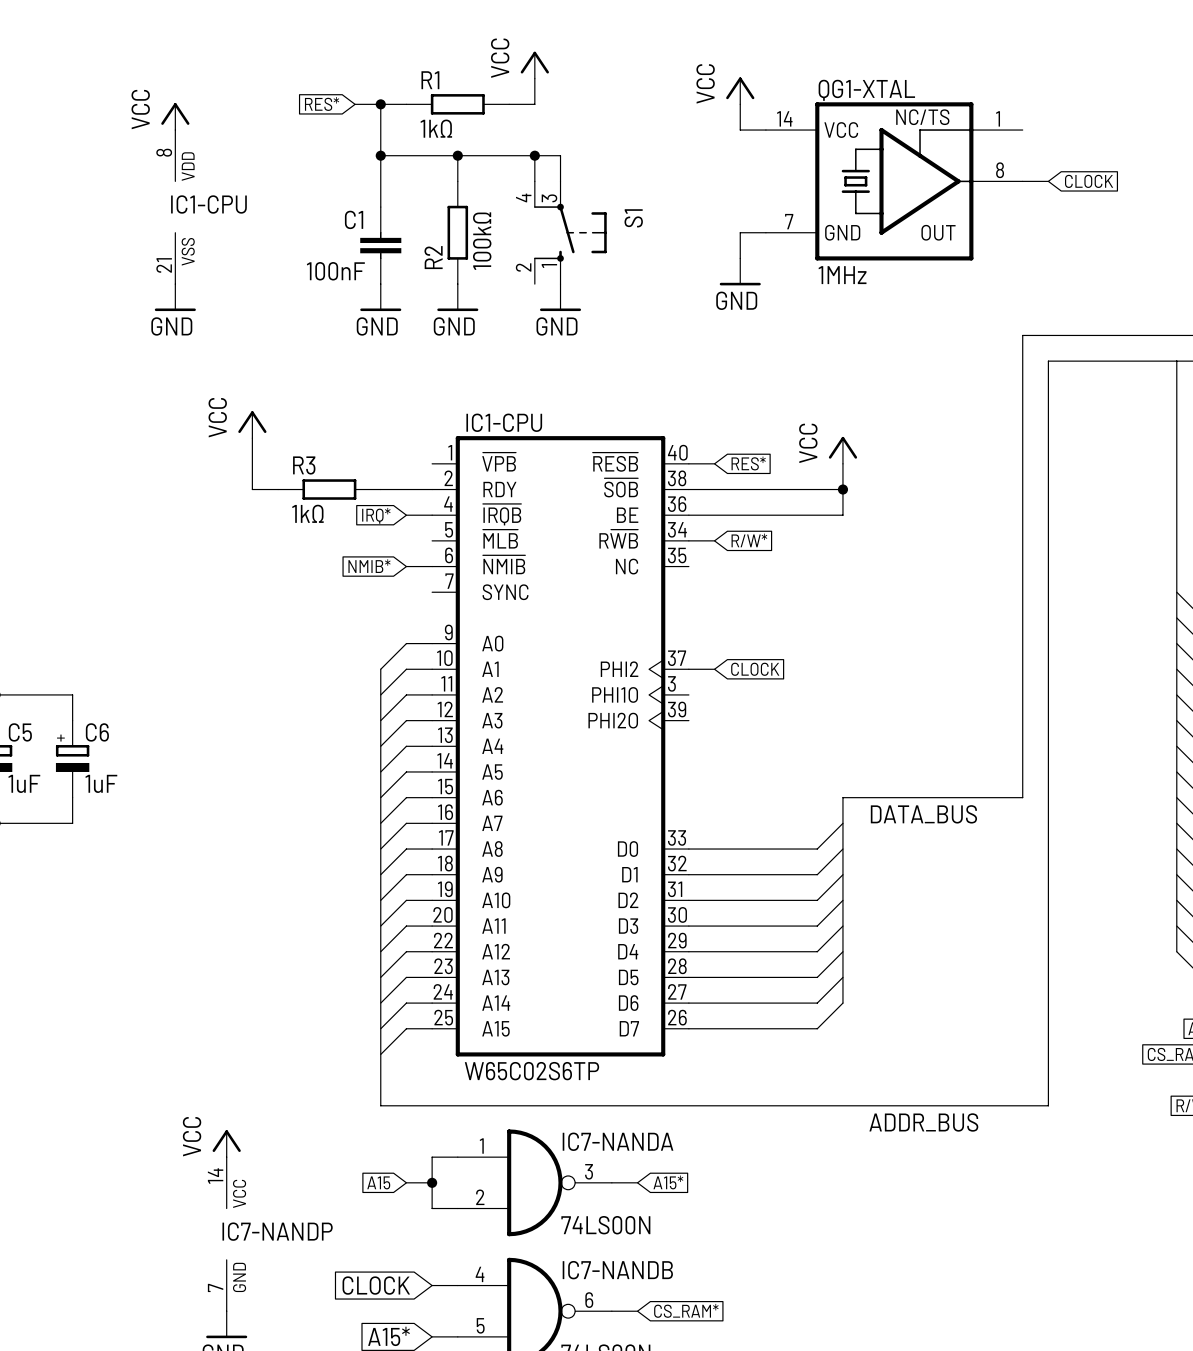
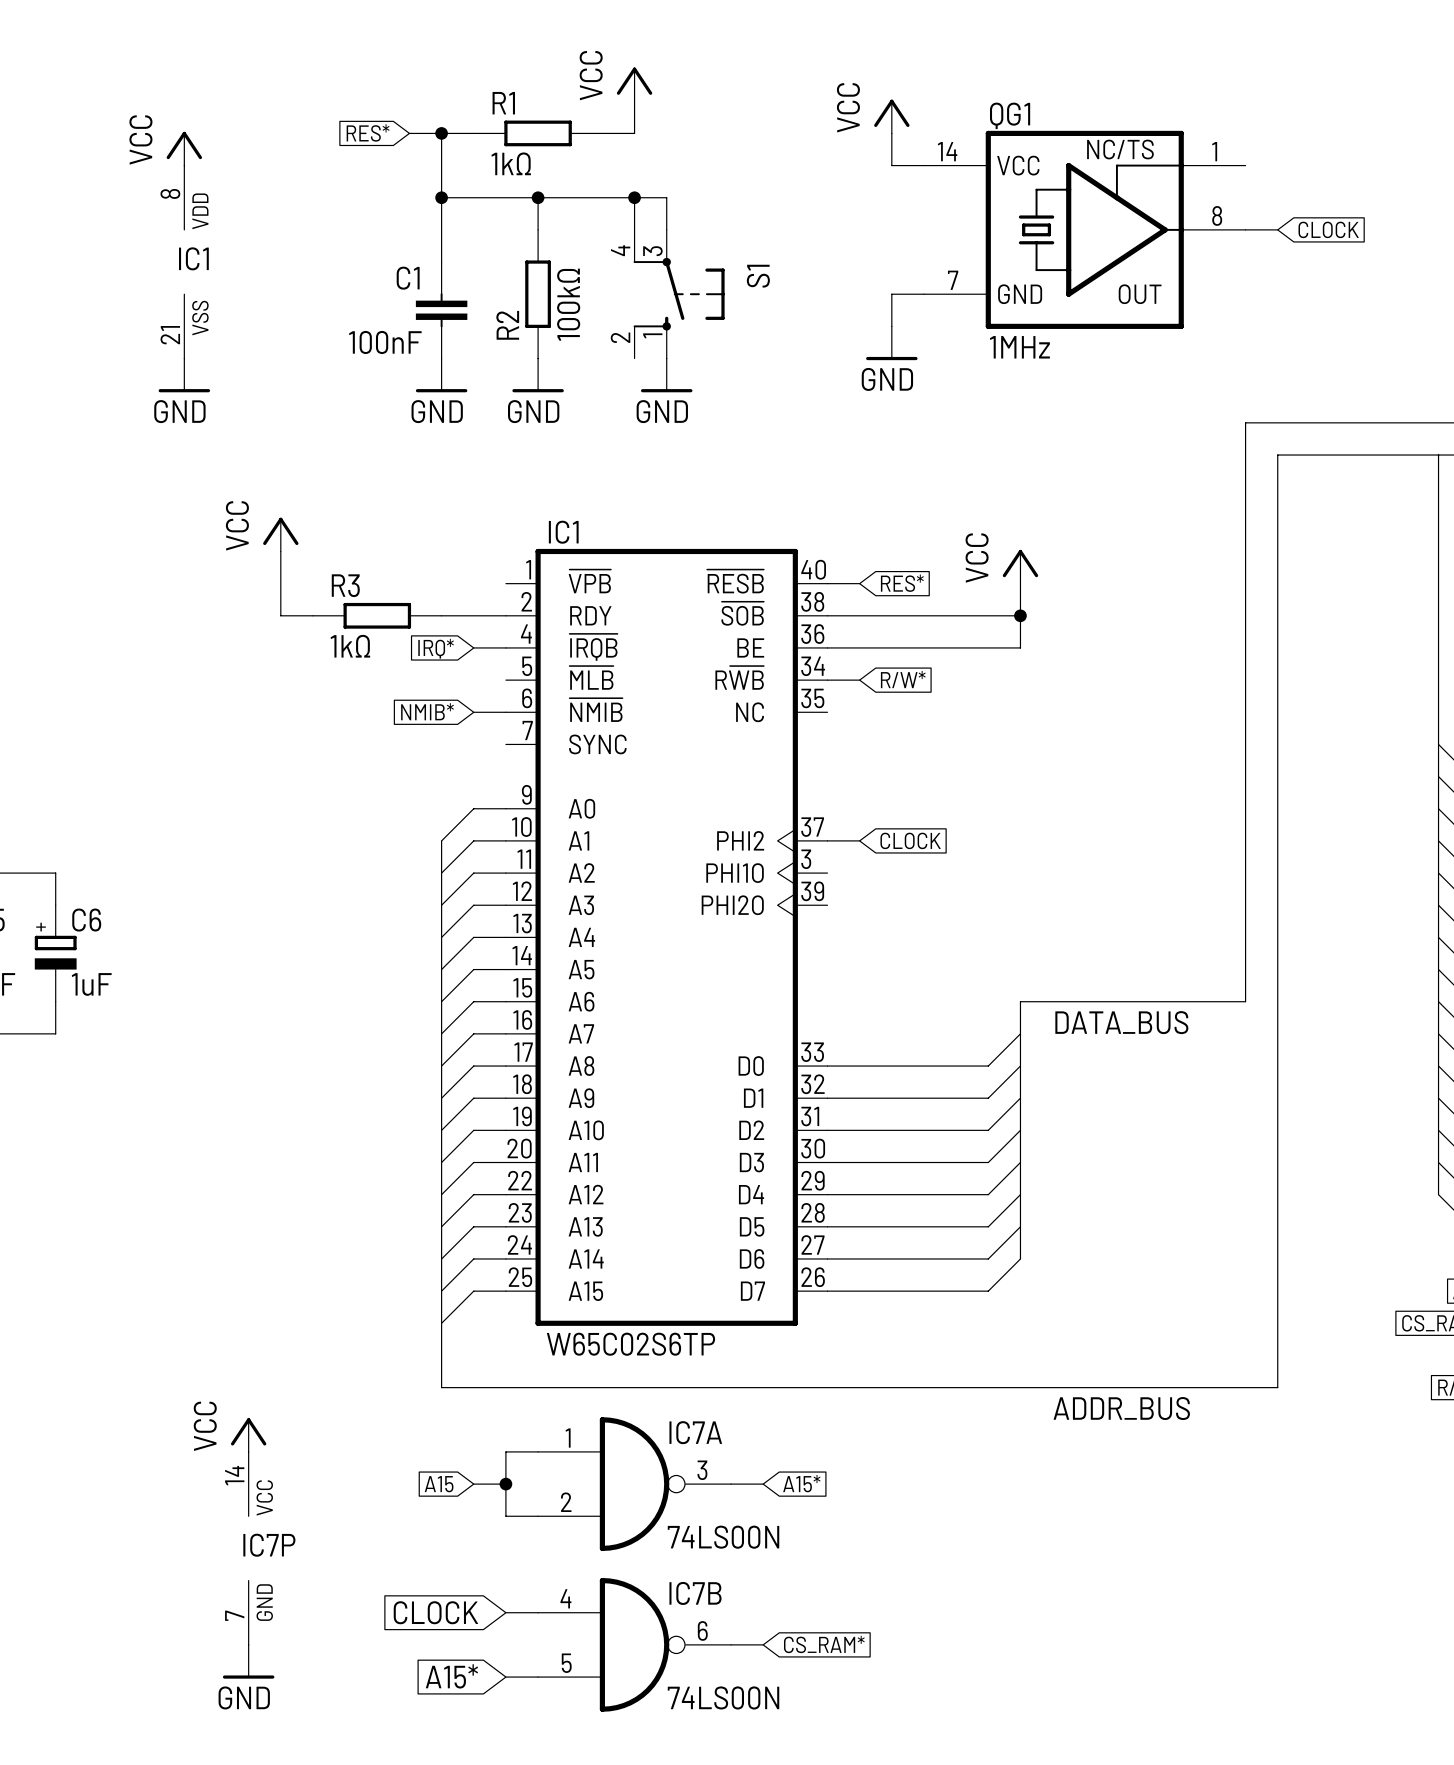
QG1-XTAL name: QG1-XTAL (866, 90) -> QG1 (1010, 115)
IC1-CPU name: IC1-CPU (208, 204) -> IC1 (193, 258)
IC1-CPU name: IC1-CPU (504, 422) -> IC1 (563, 532)
IC7-NANDA name: IC7-NANDA (618, 1141) -> IC7A (695, 1432)
IC7-NANDP name: IC7-NANDP (277, 1231) -> IC7P (269, 1545)
IC7-NANDB name: IC7-NANDB (617, 1270) -> IC7B (695, 1593)

